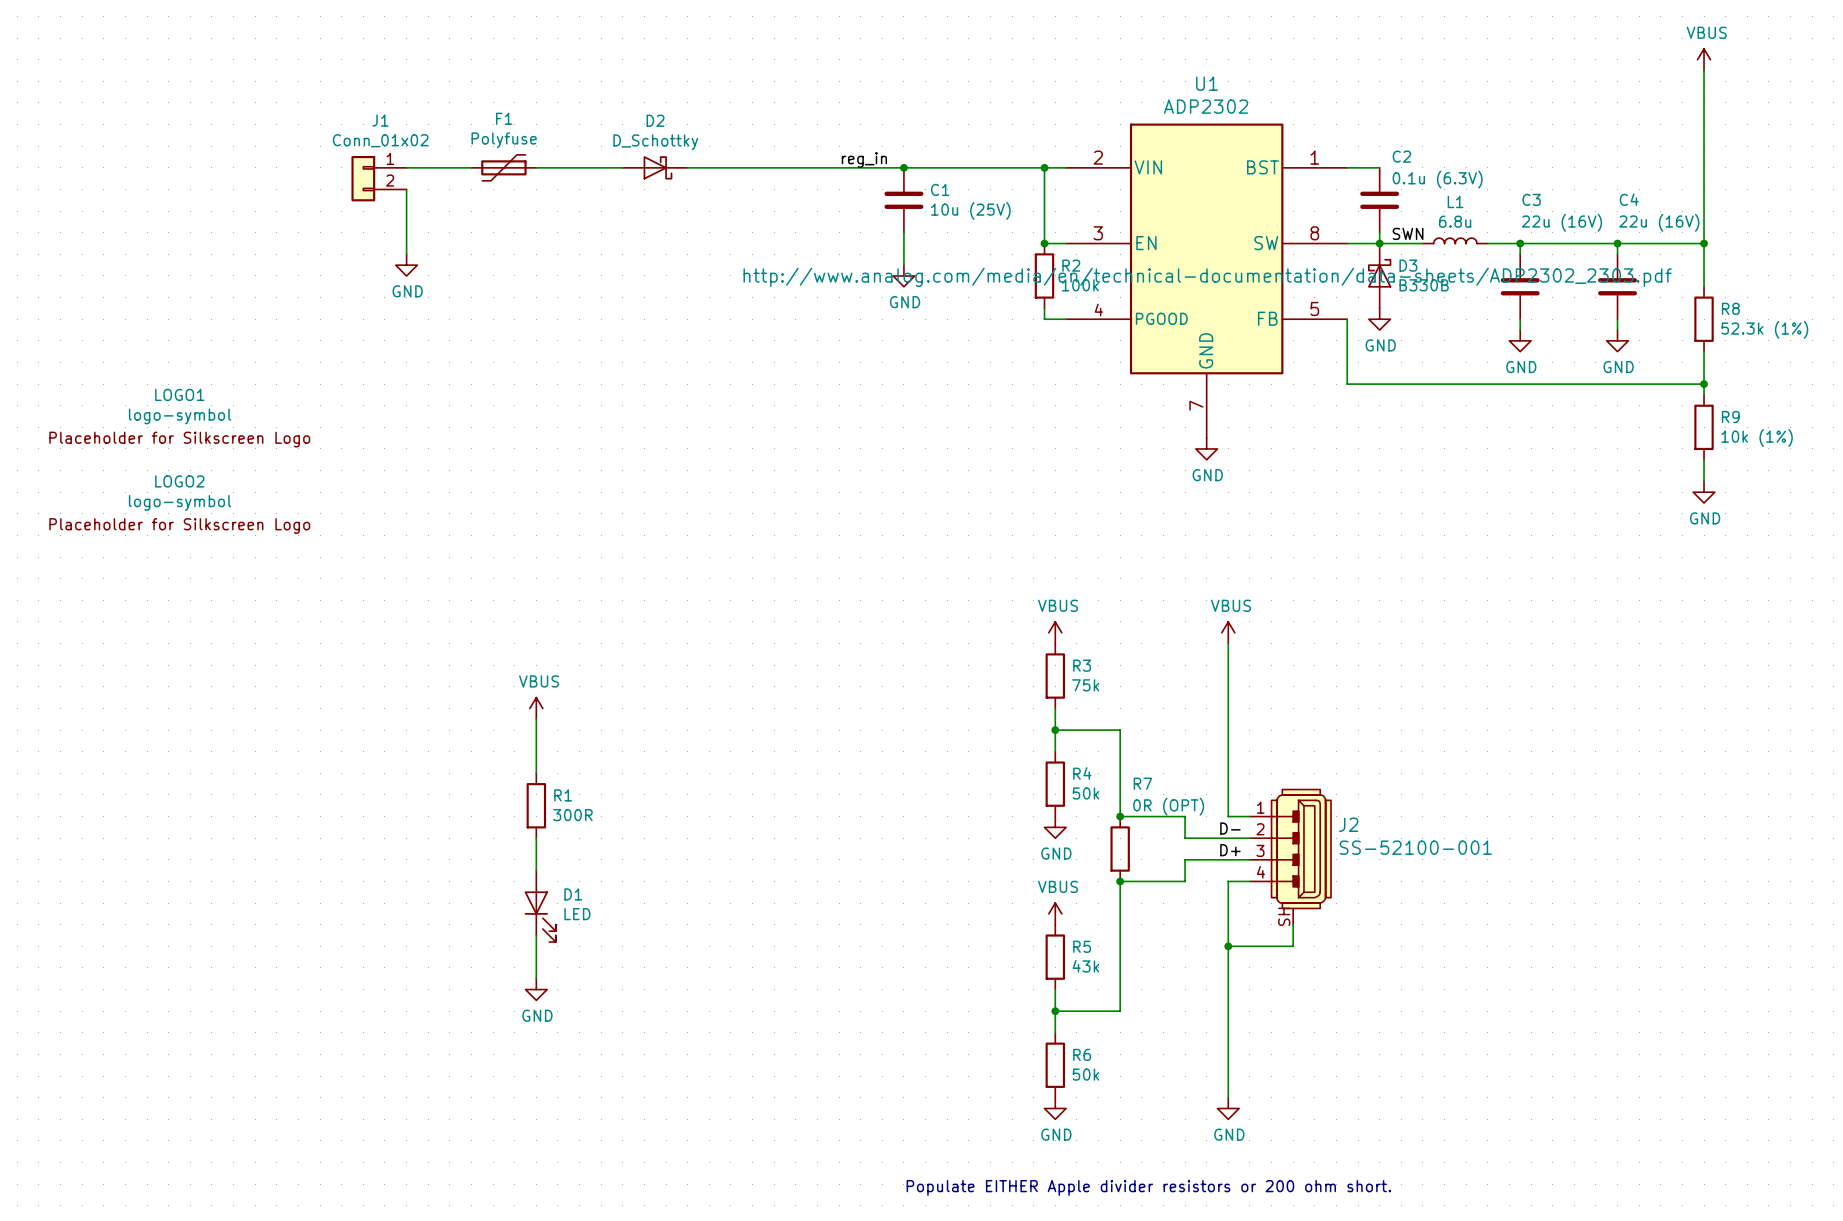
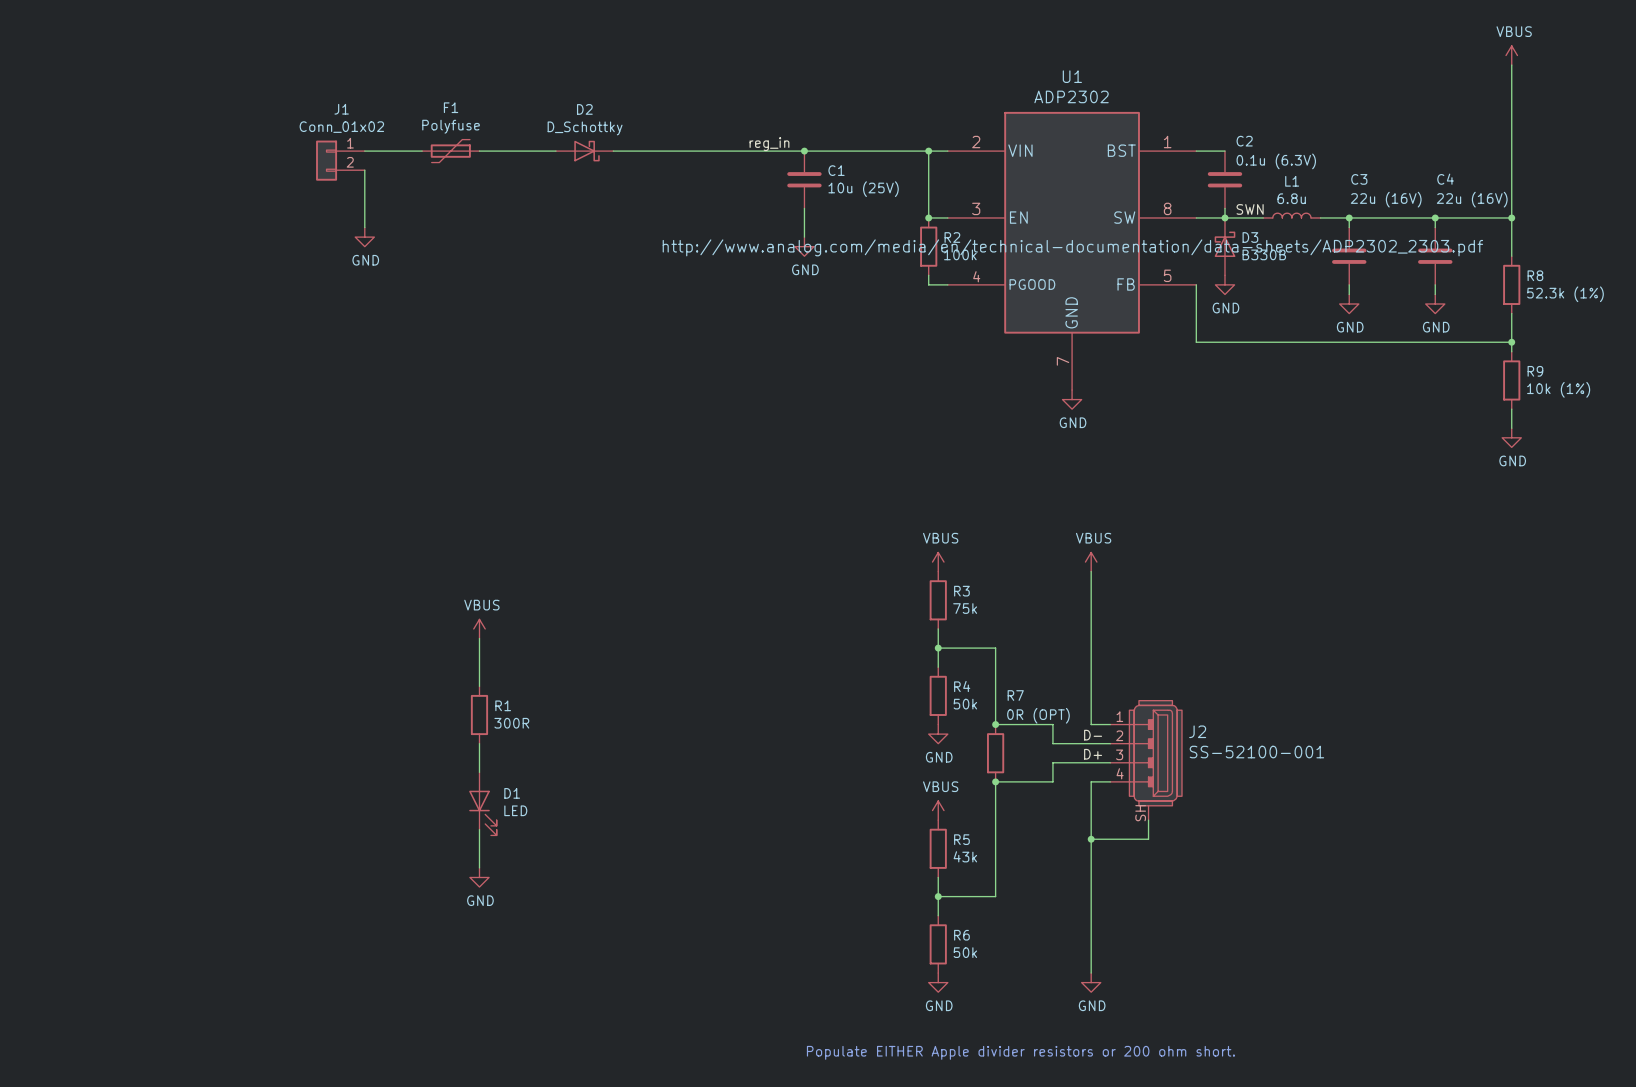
LOGO1: logo-symbol (179, 418) -> none
LOGO2: logo-symbol (179, 504) -> none

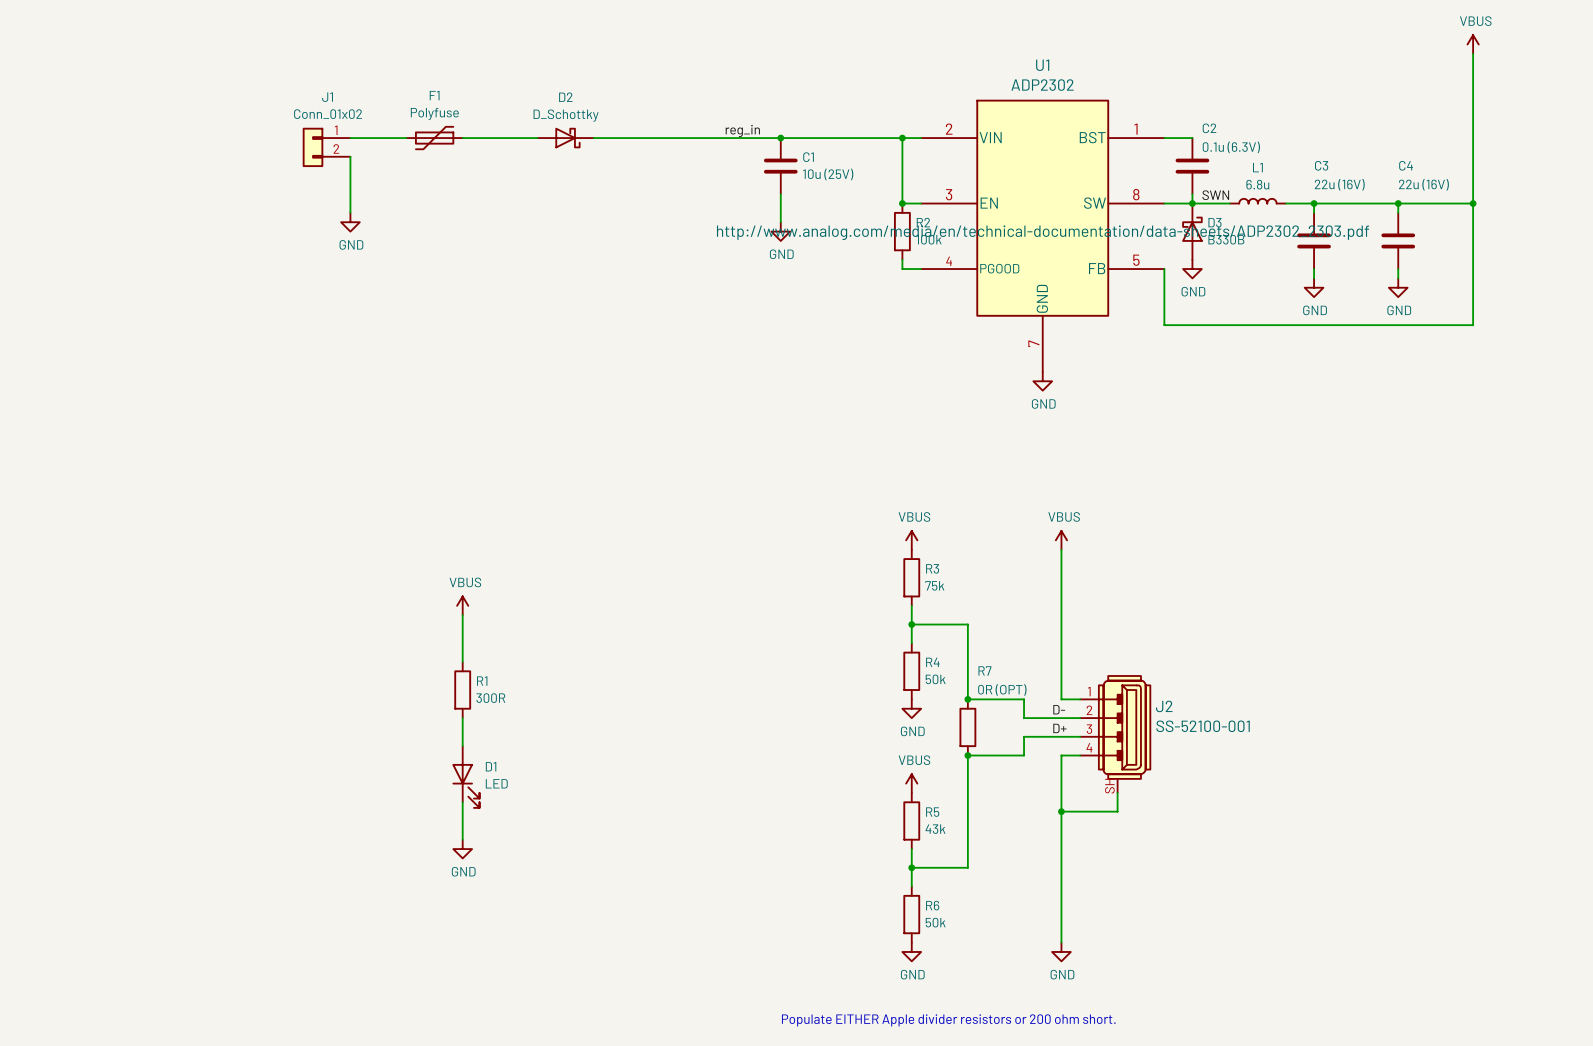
wire: none -> (1473, 240) (1473, 297)
R8: 52.3k (1%) (1511, 284) -> none
wire: (1511, 342) (1511, 351) -> none
junction: (1511, 342) -> none
R9: 10k (1%) (1511, 380) -> none
wire: (1511, 409) (1511, 428) -> none
power symbol: GND (1511, 437) -> none

